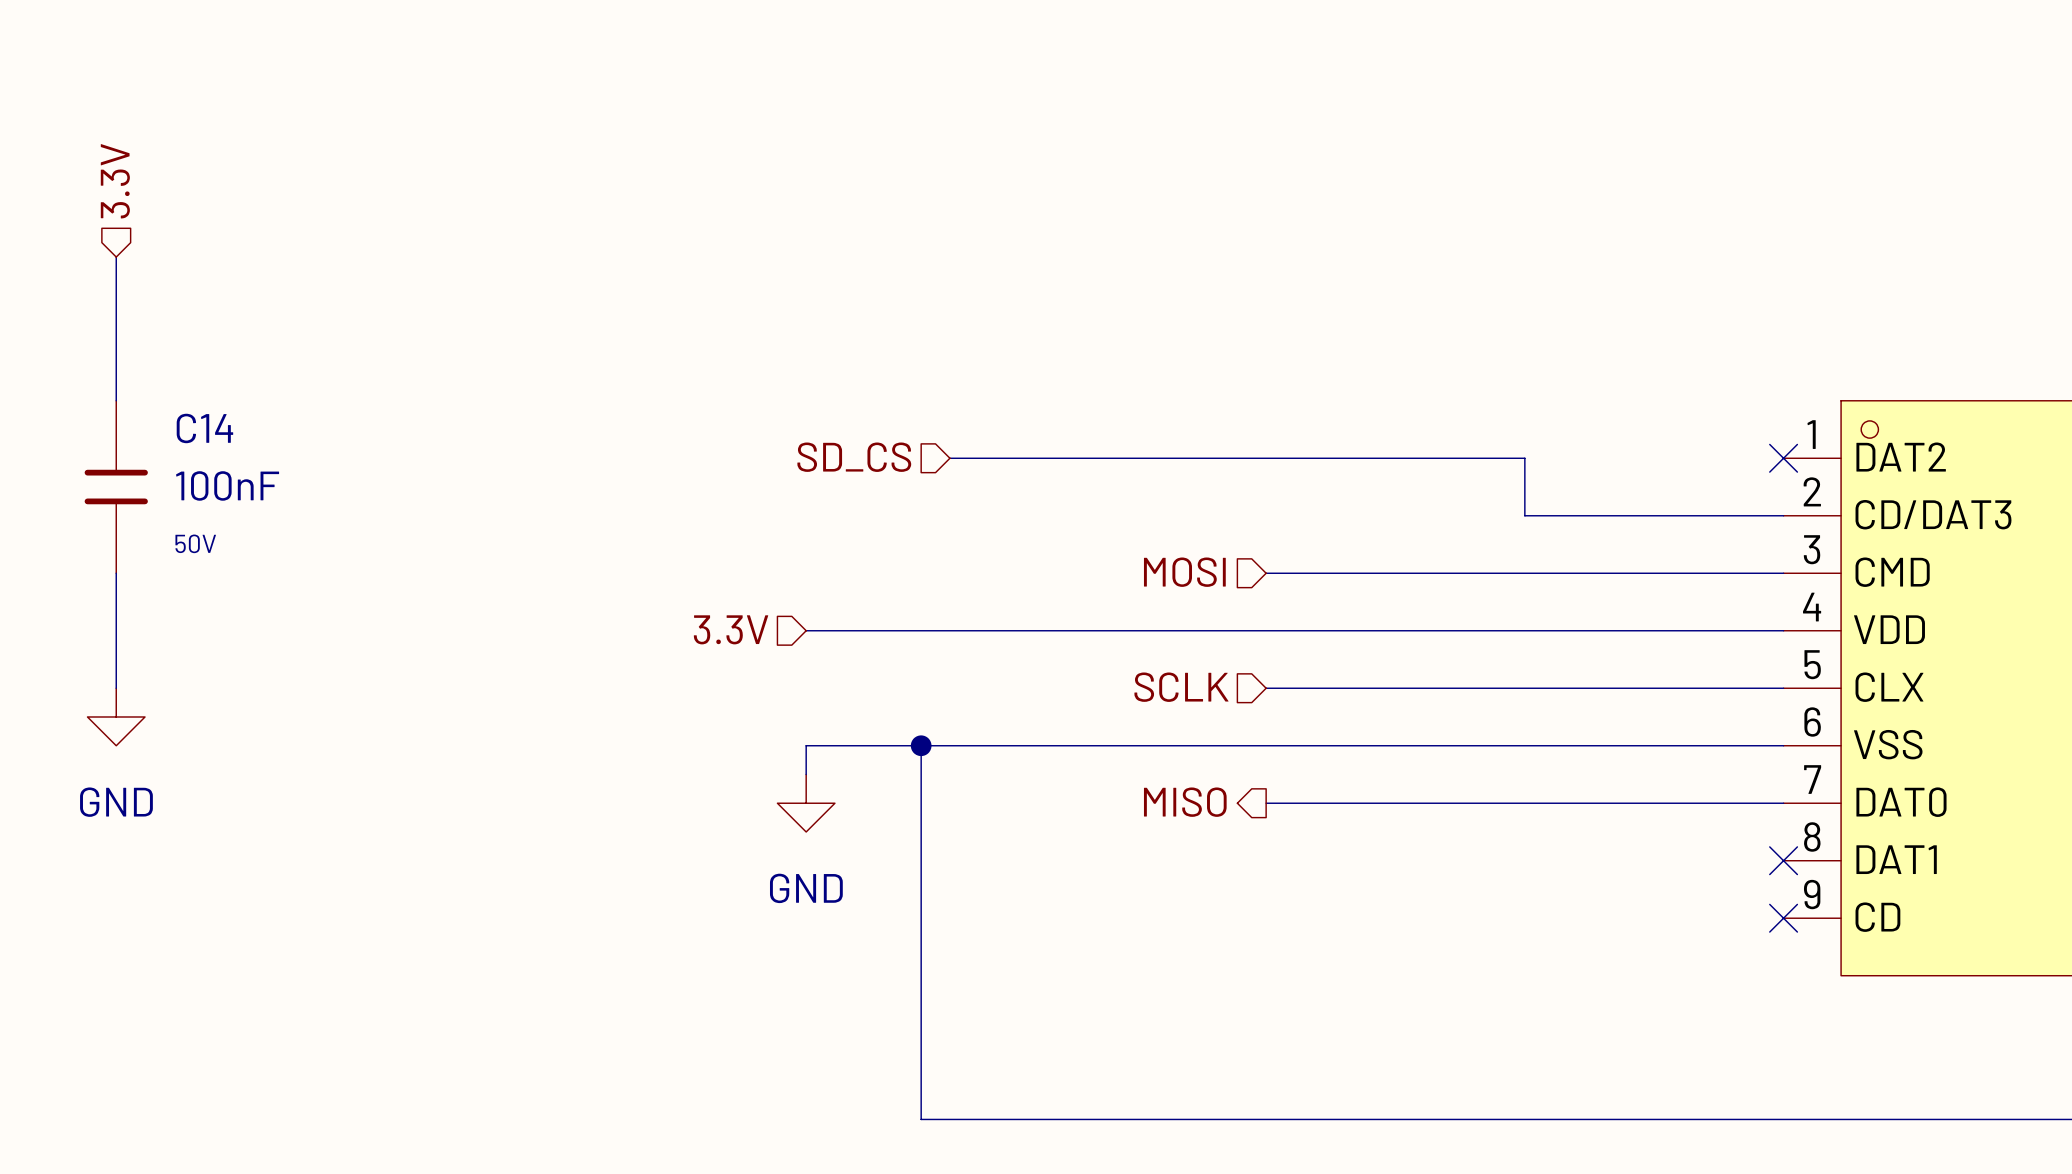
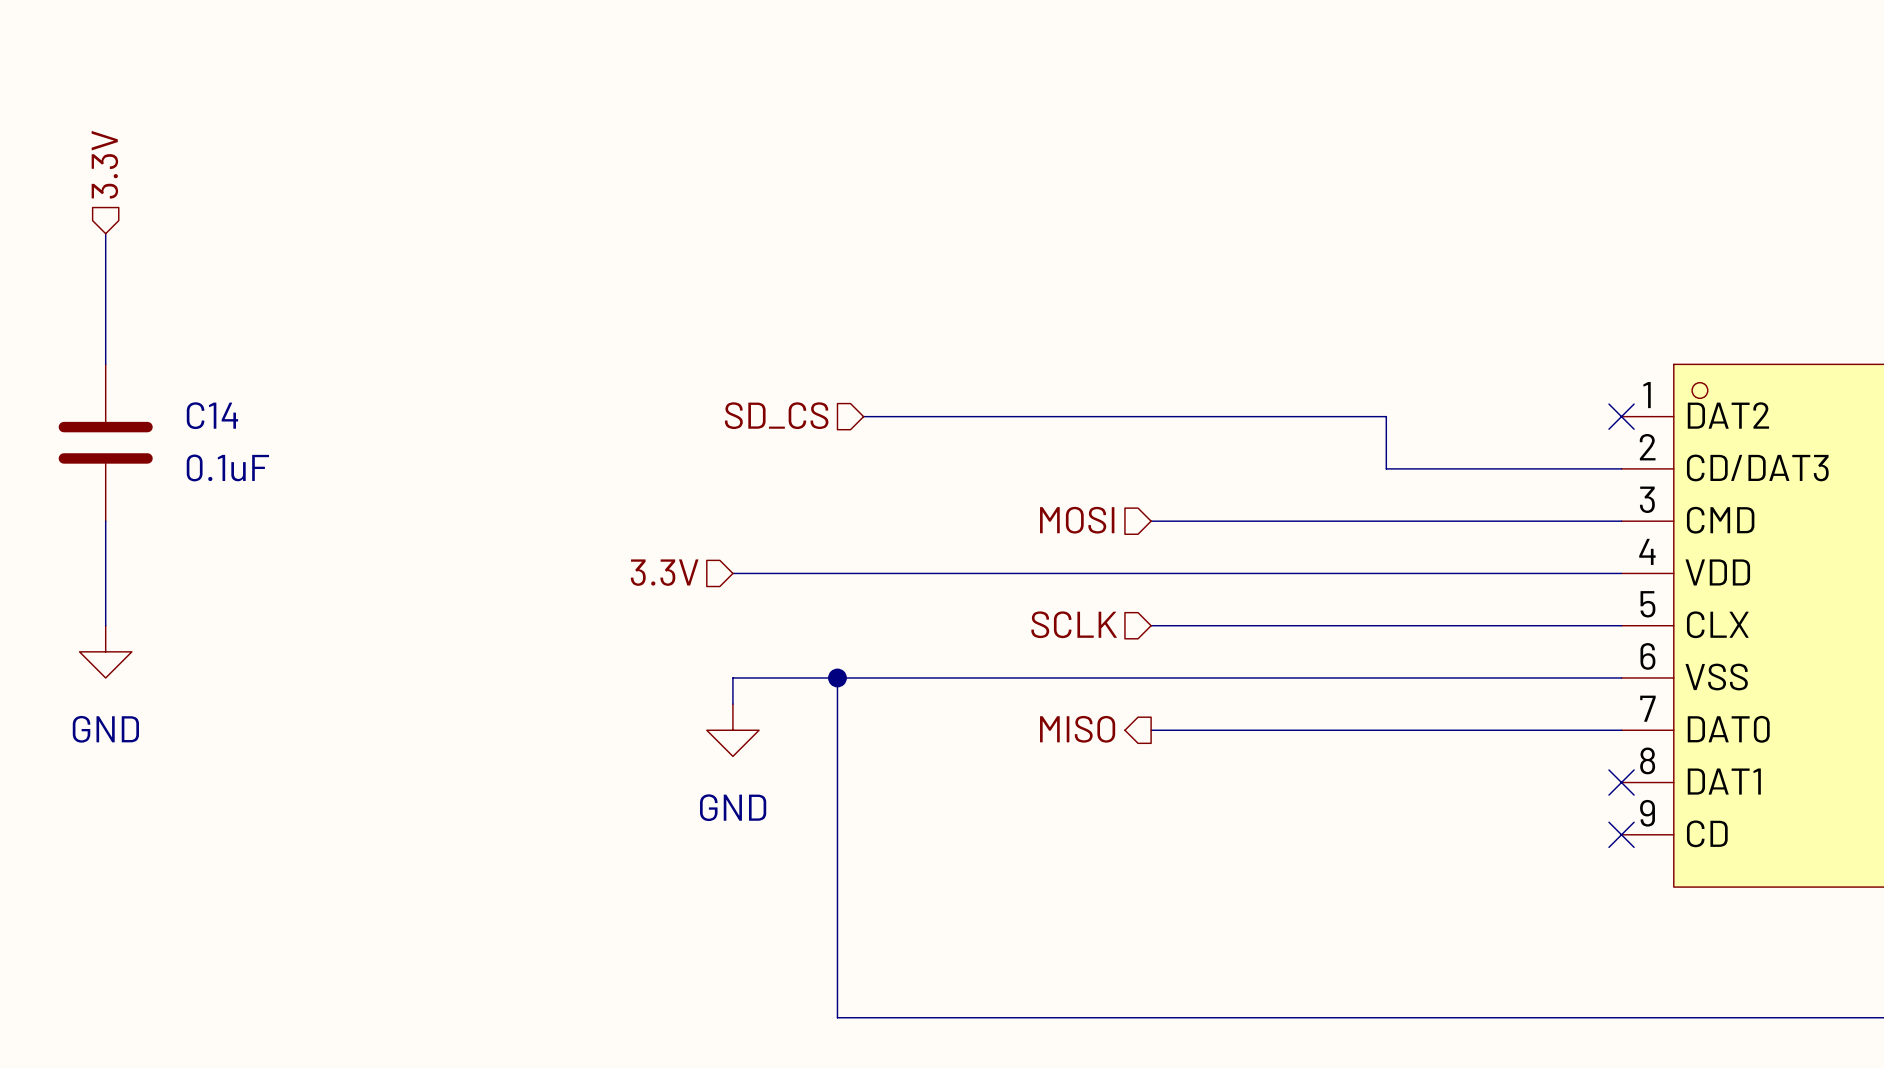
C14 symbol: [84, 400, 148, 574] -> [58, 364, 153, 522]
C14 name position: C14 (204, 428) -> C14 (212, 415)
C14 value: 100nF (227, 485) -> 0.1uF (227, 467)
C14 text: 50V (195, 543) -> none

